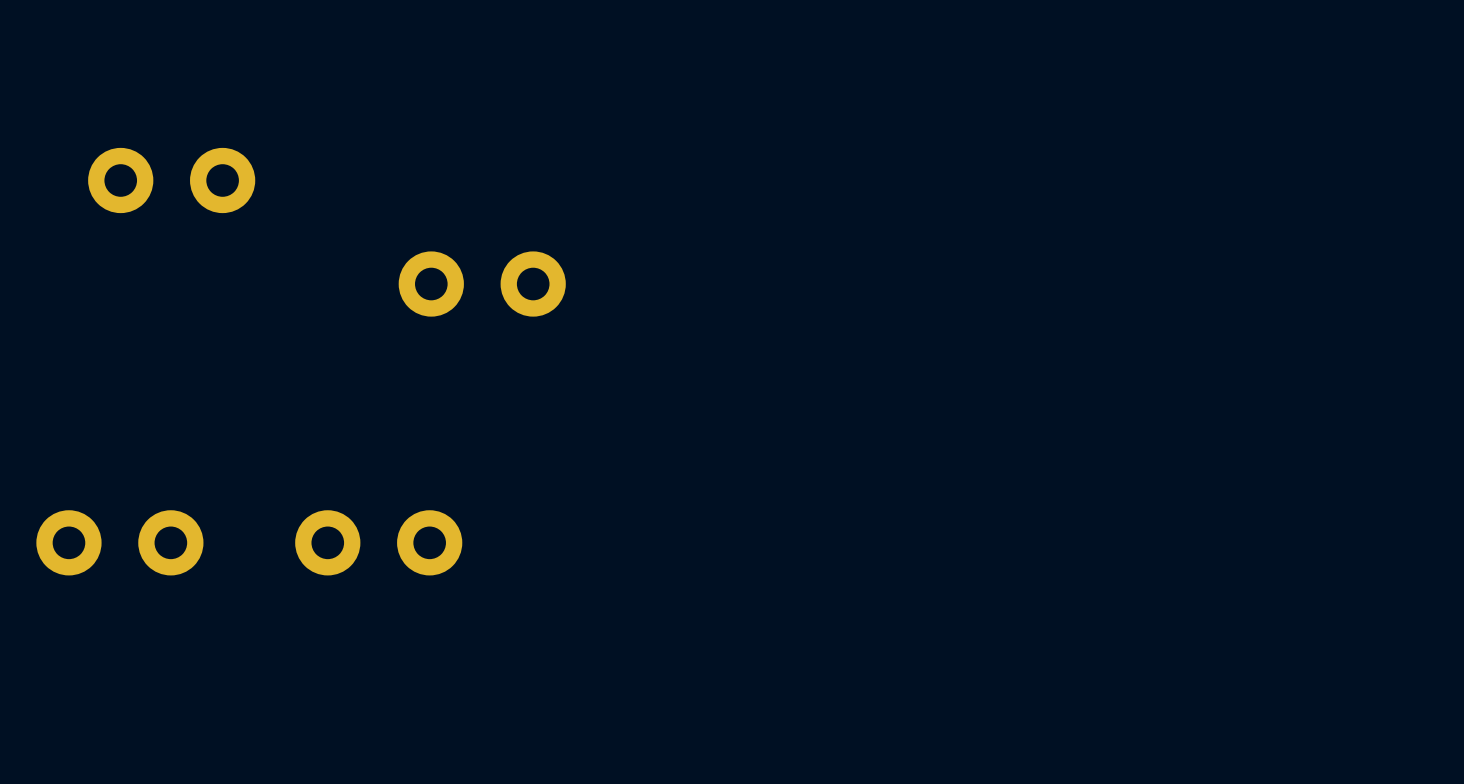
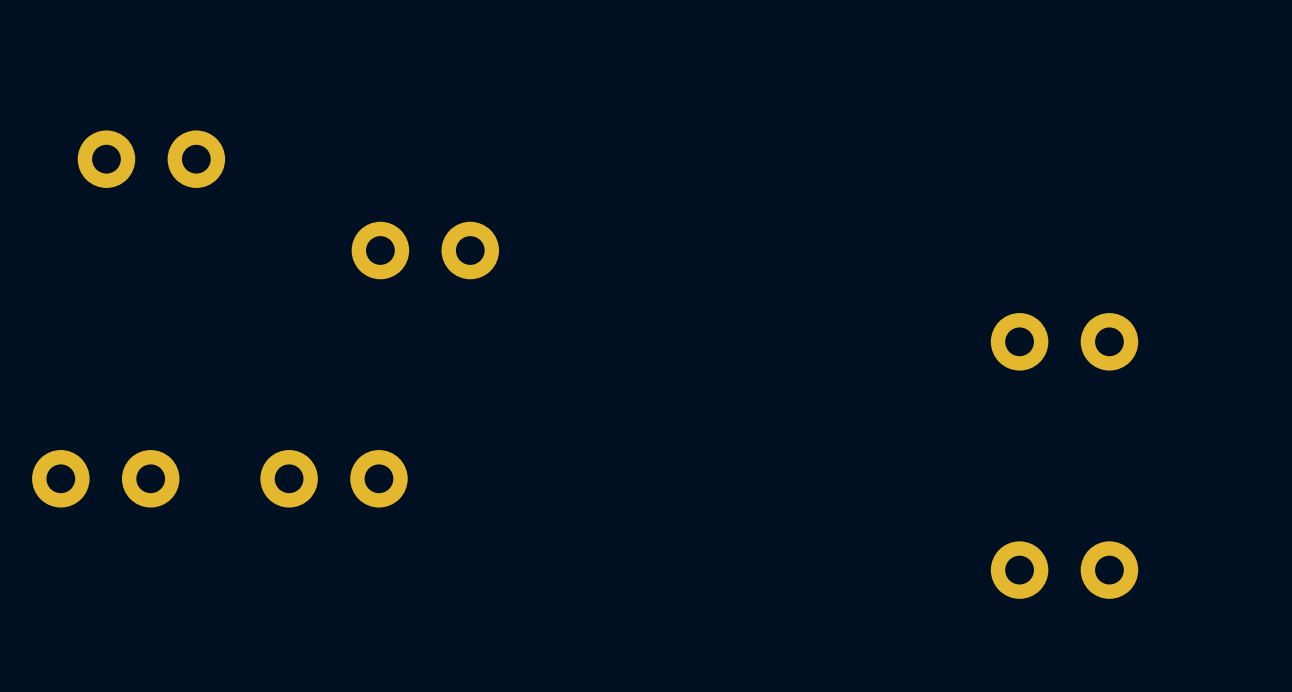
part: none -> (1064, 341)
part: none -> (1064, 570)

